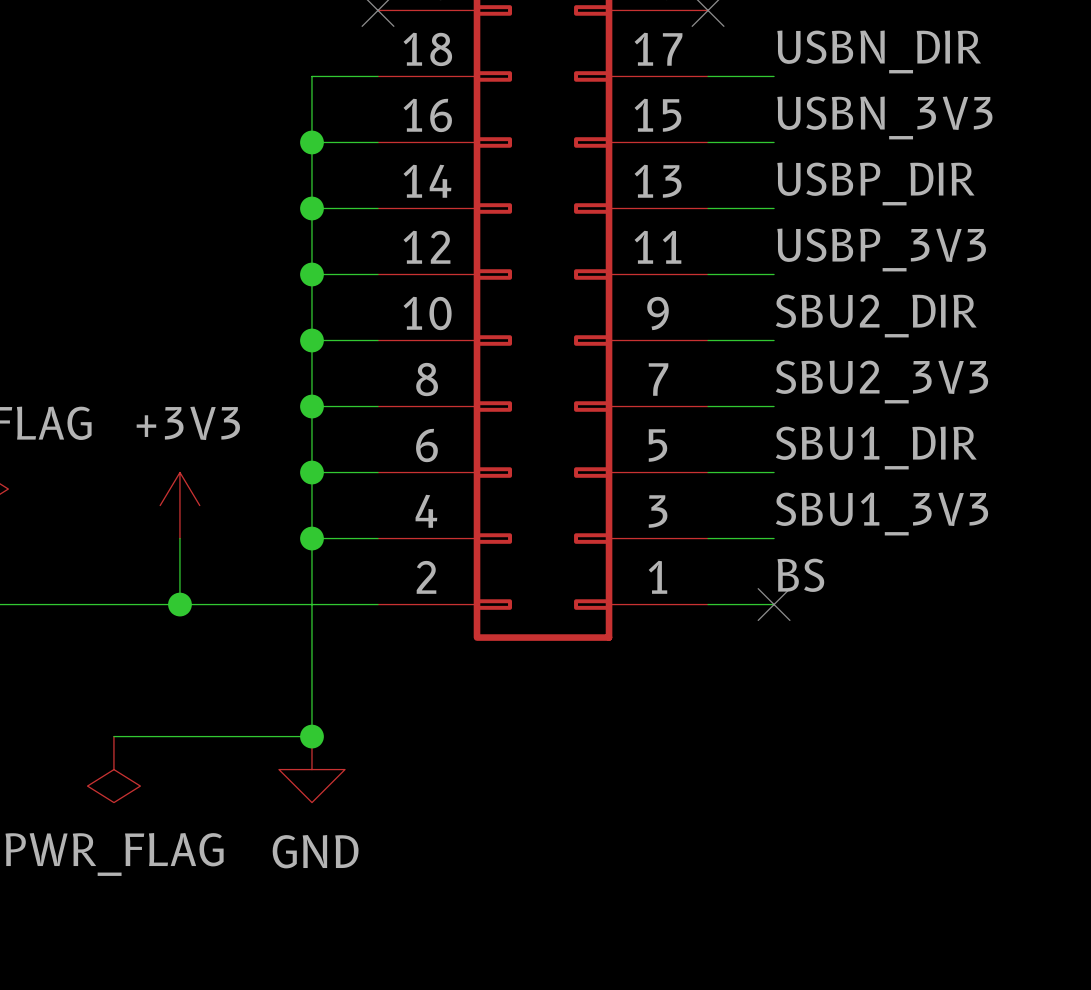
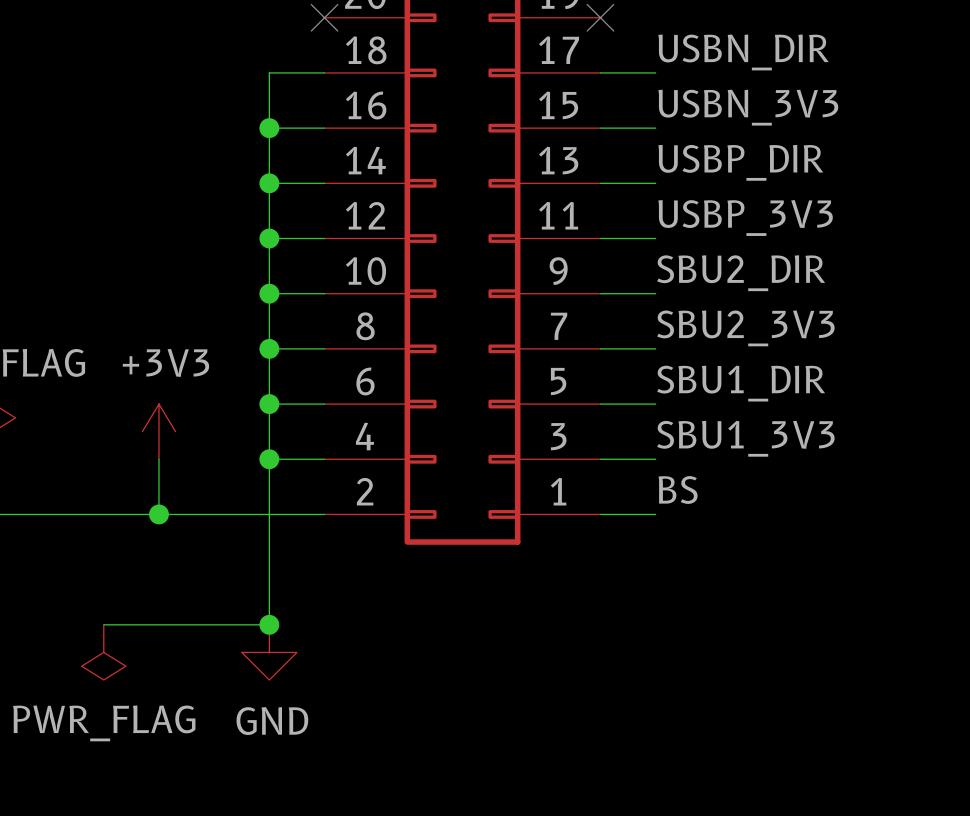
no-connect mark: (774, 604) -> none

